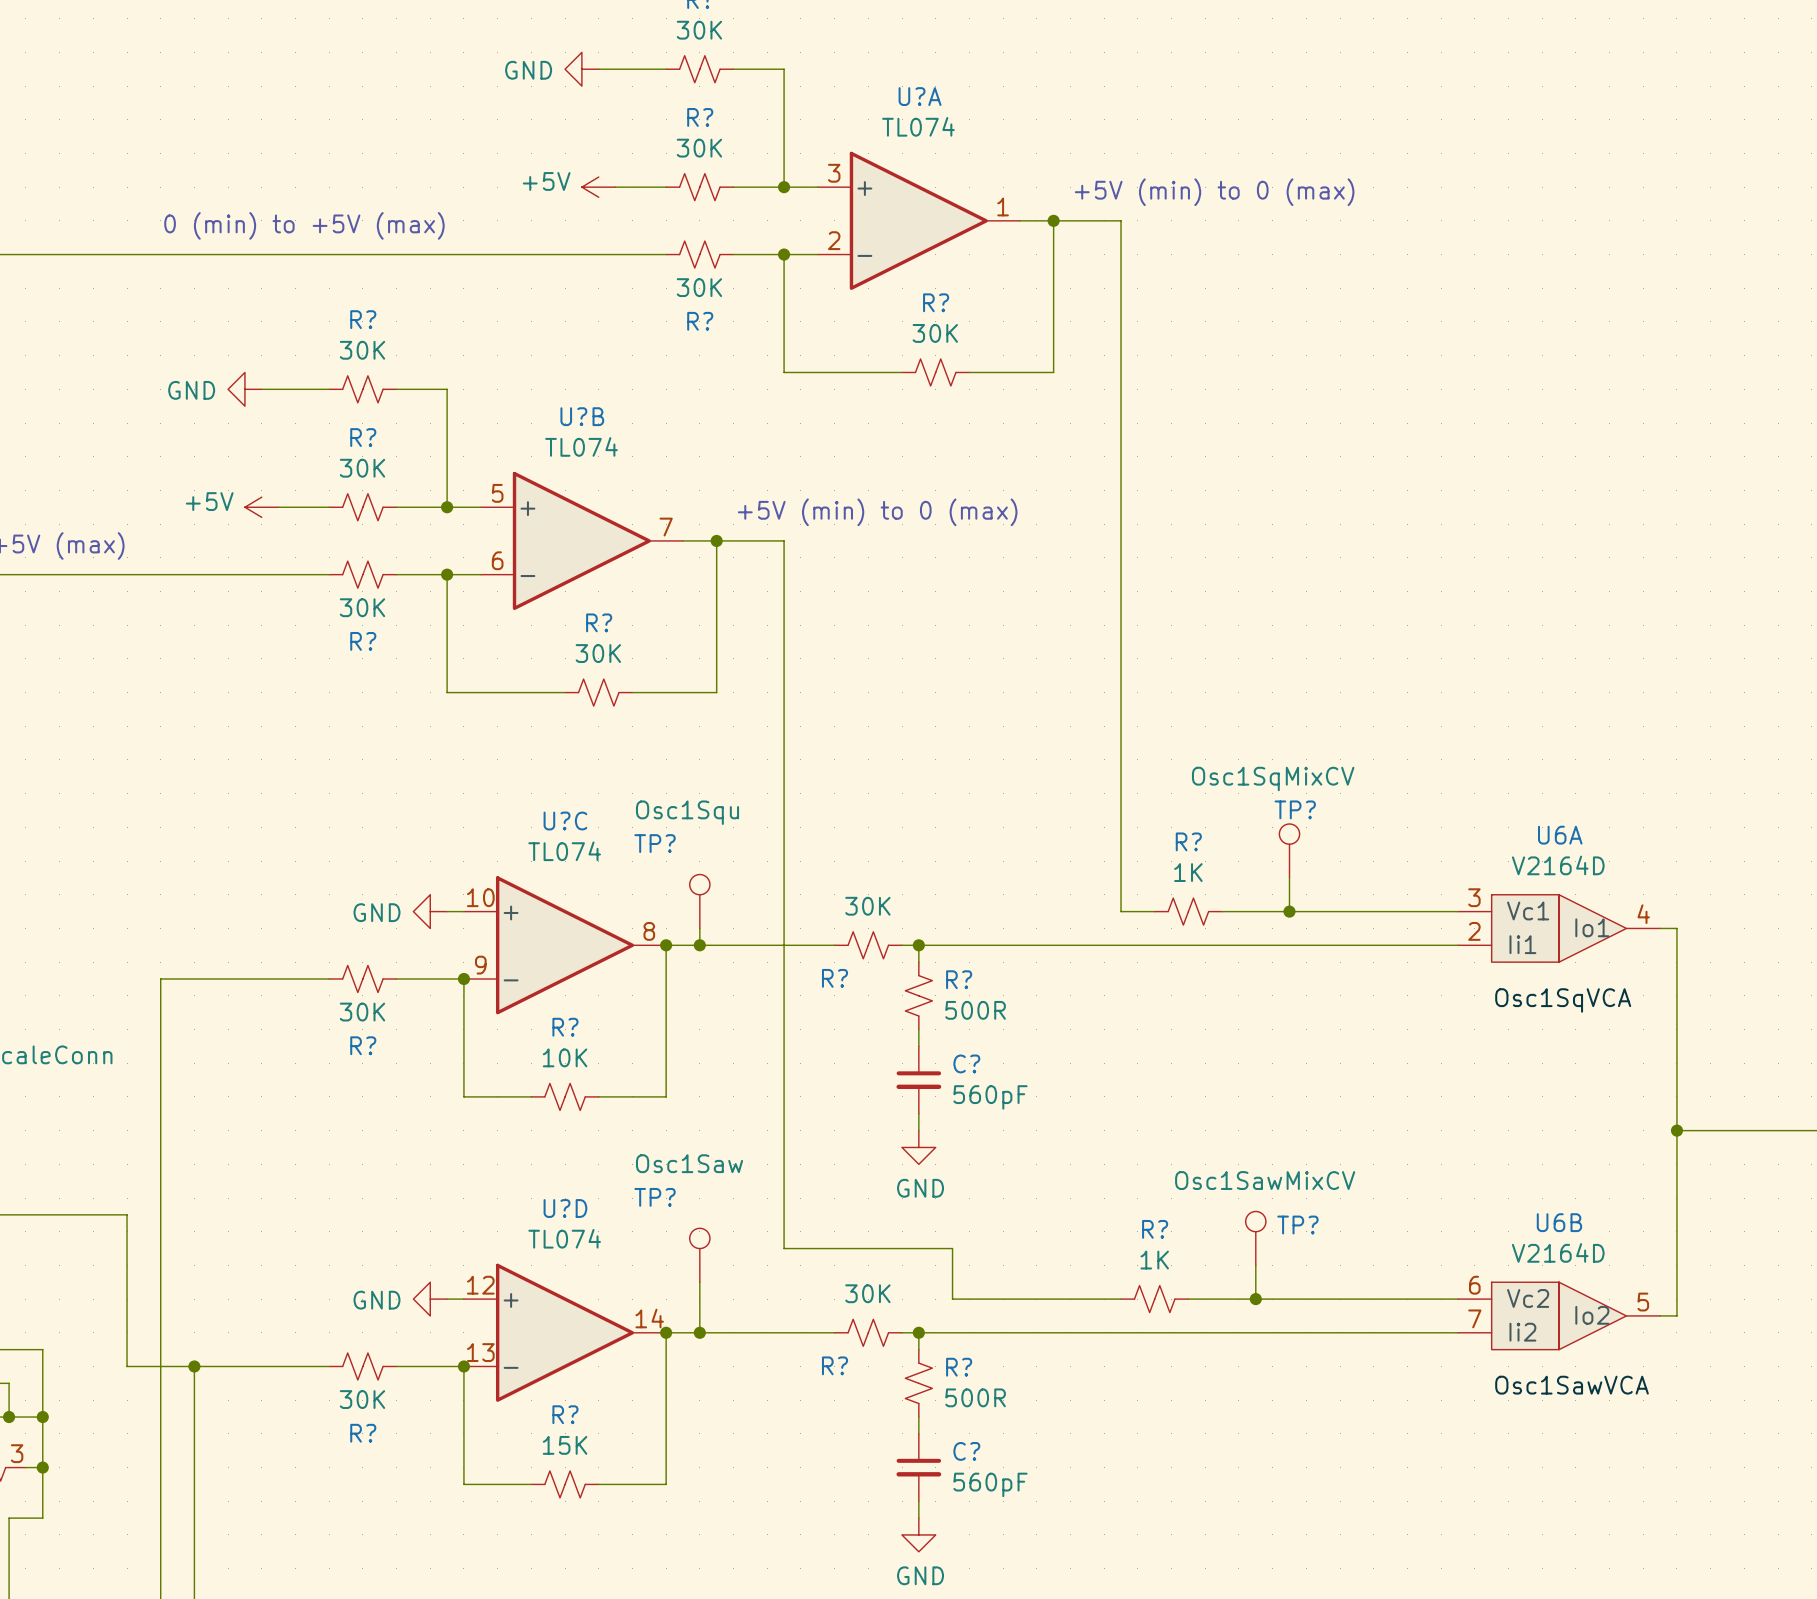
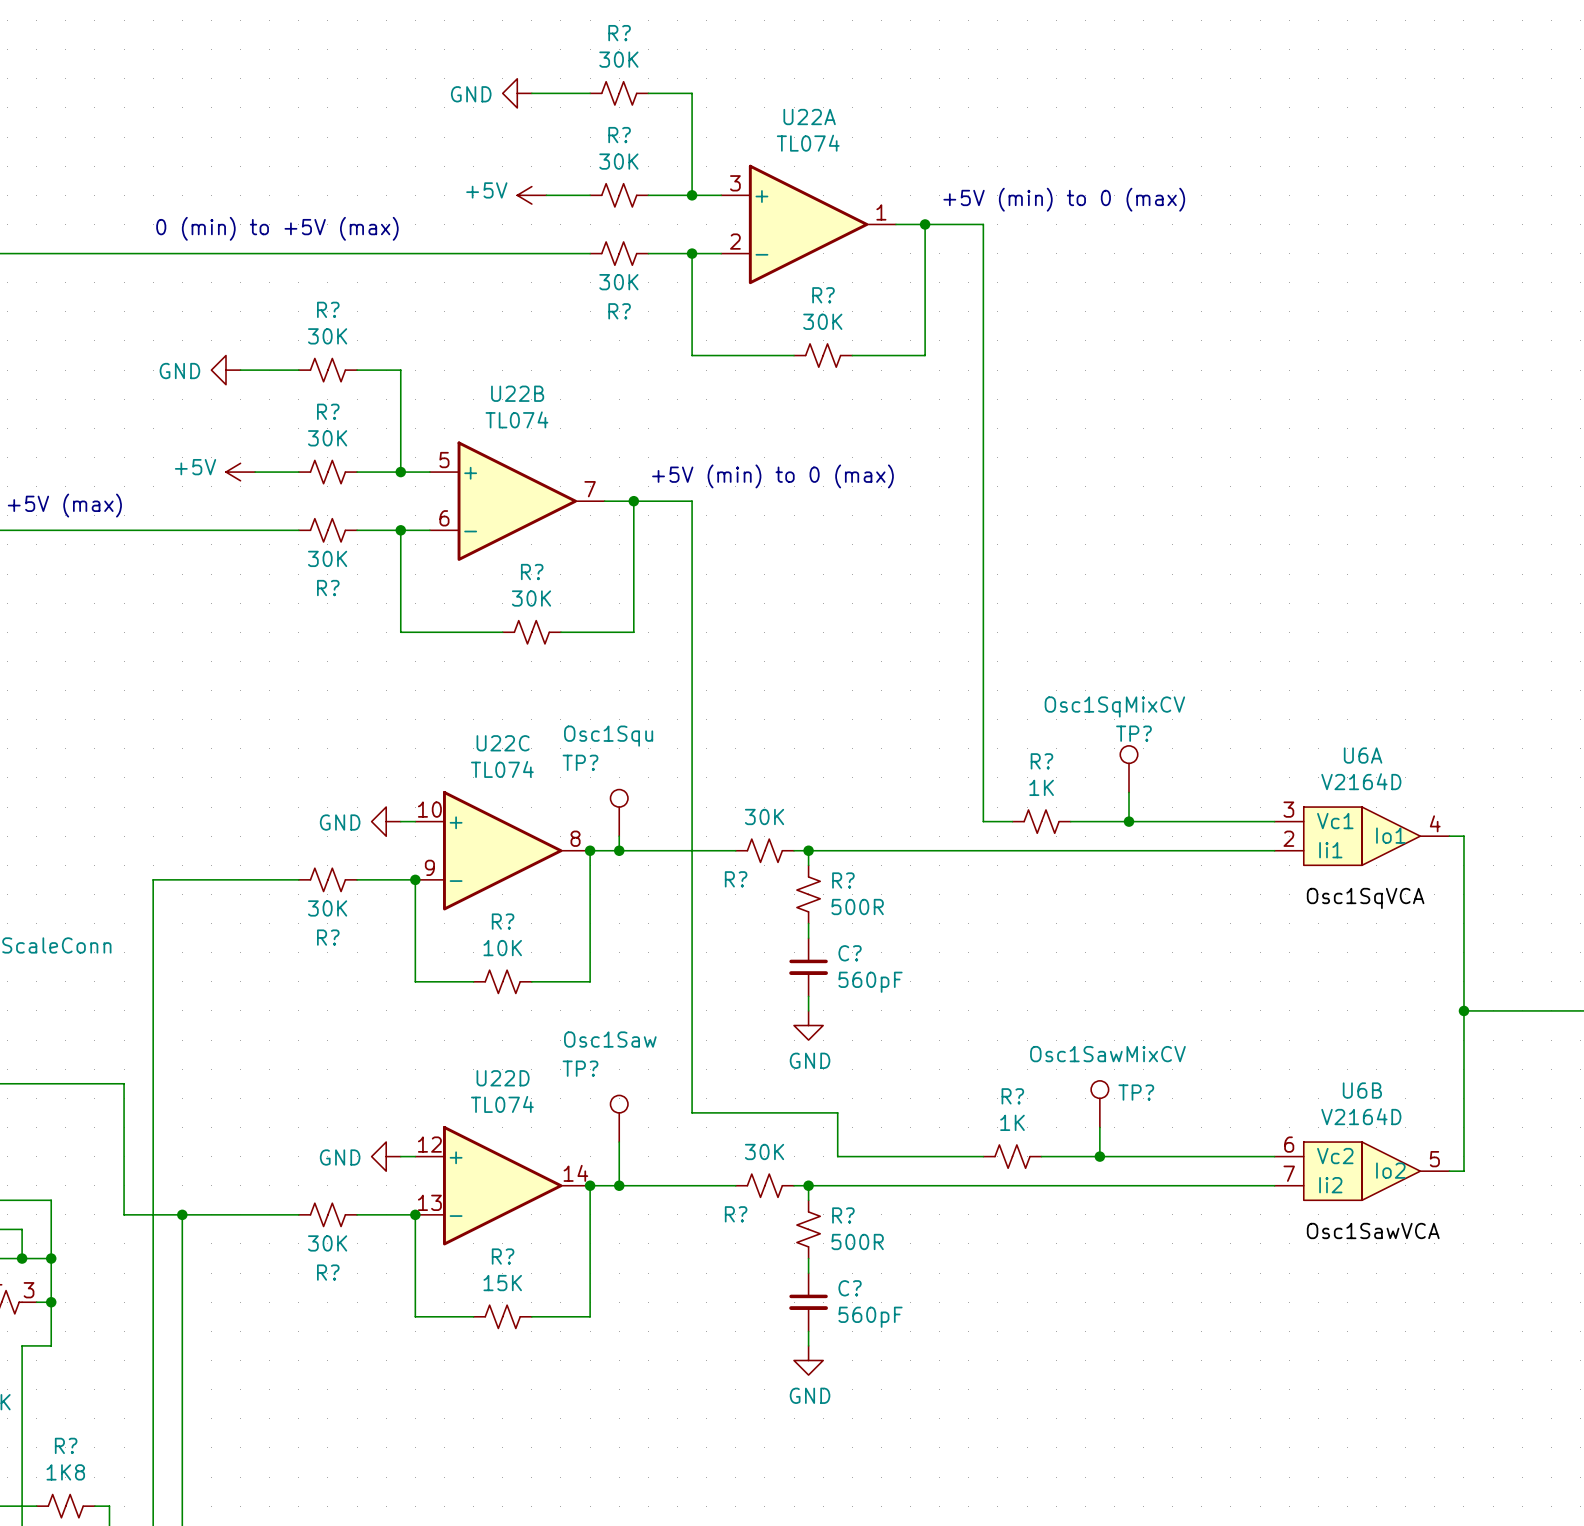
U?A name: U?A (920, 96) -> U22A (809, 117)
U?B name: U?B (582, 416) -> U22B (517, 393)
U?C name: U?C (565, 821) -> U22C (503, 743)
U?D name: U?D (565, 1208) -> U22D (503, 1078)

